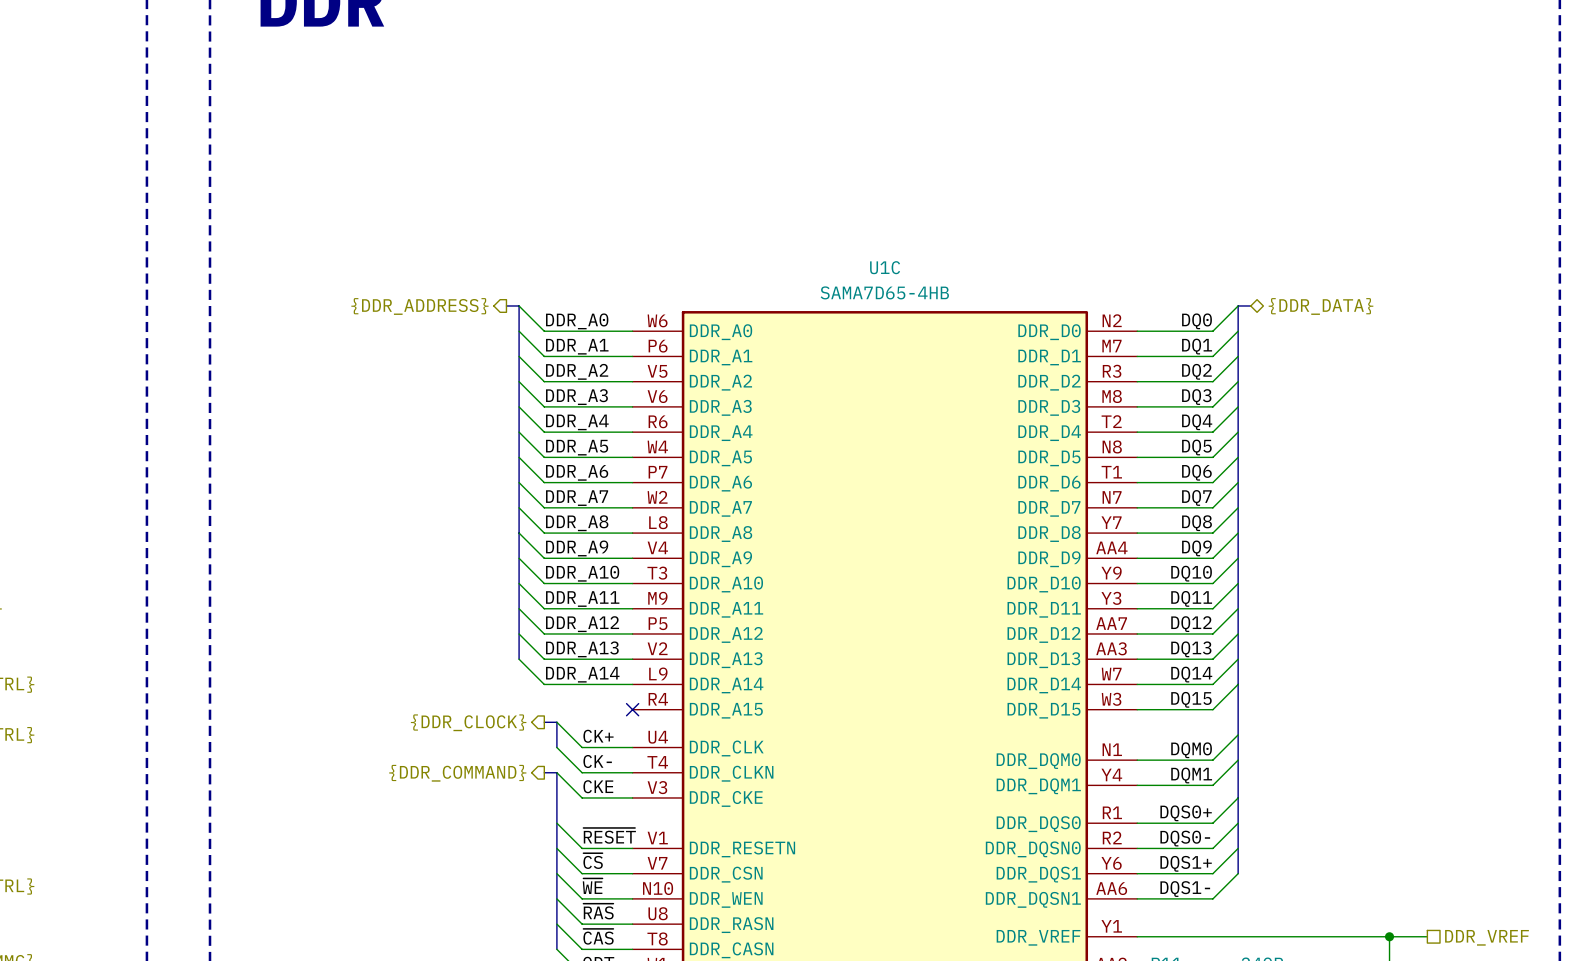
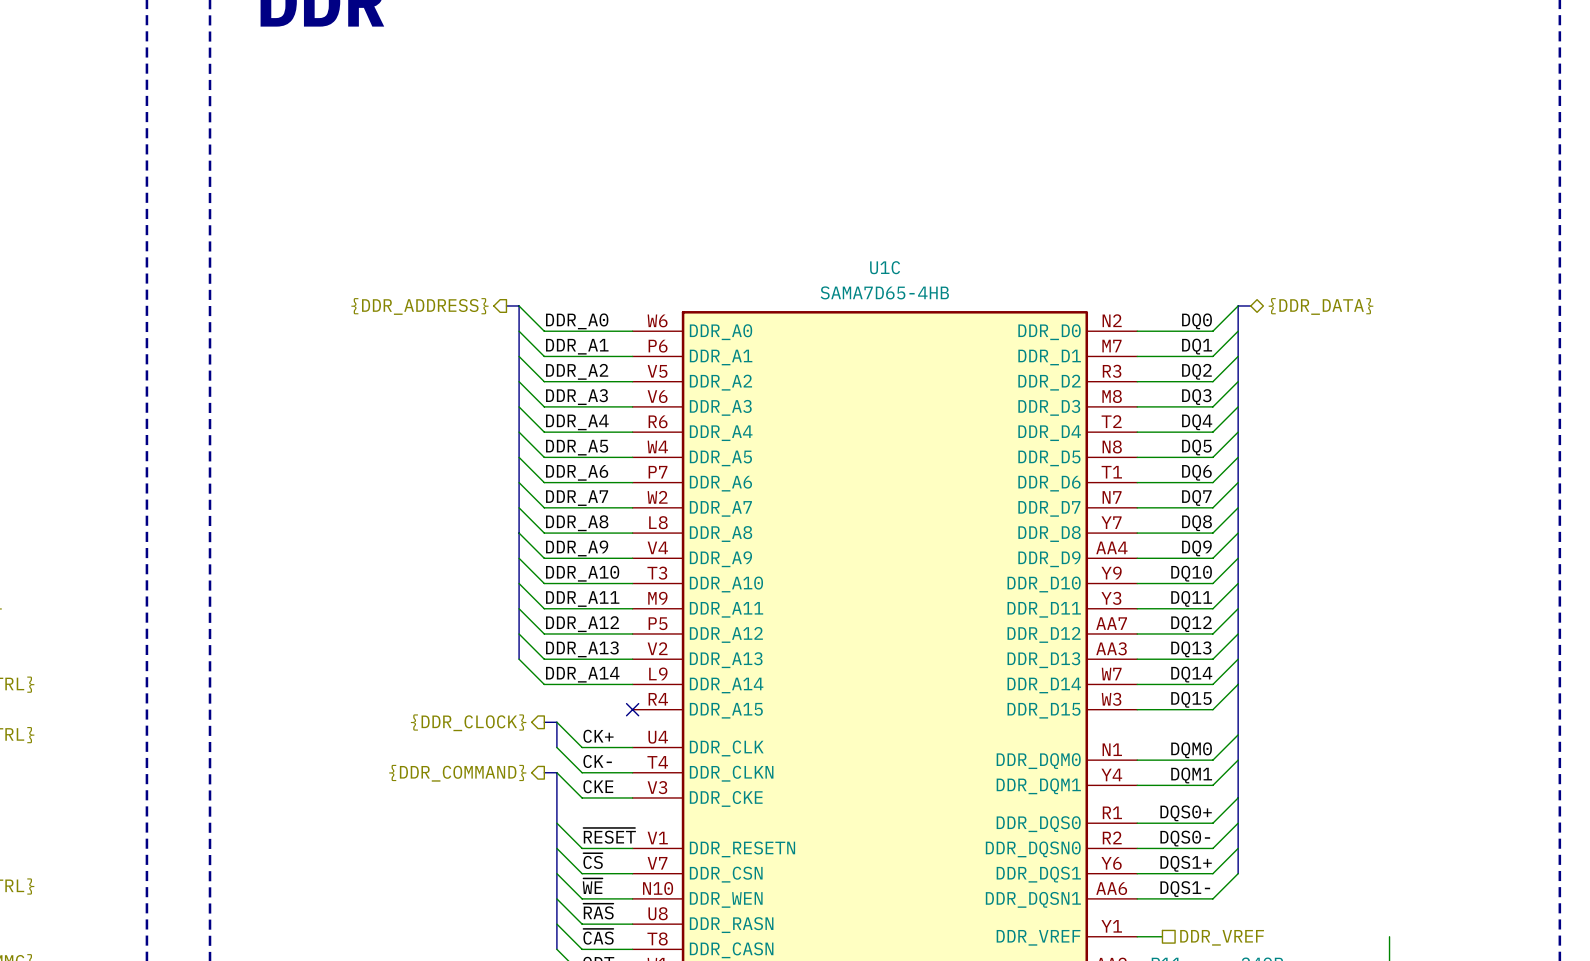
wire: (1162, 936) (1427, 936) -> none
junction: (1389, 936) -> none
hierarchical label: none -> DDR_VREF (1222, 937)
hierarchical label: DDR_VREF (1487, 937) -> none

